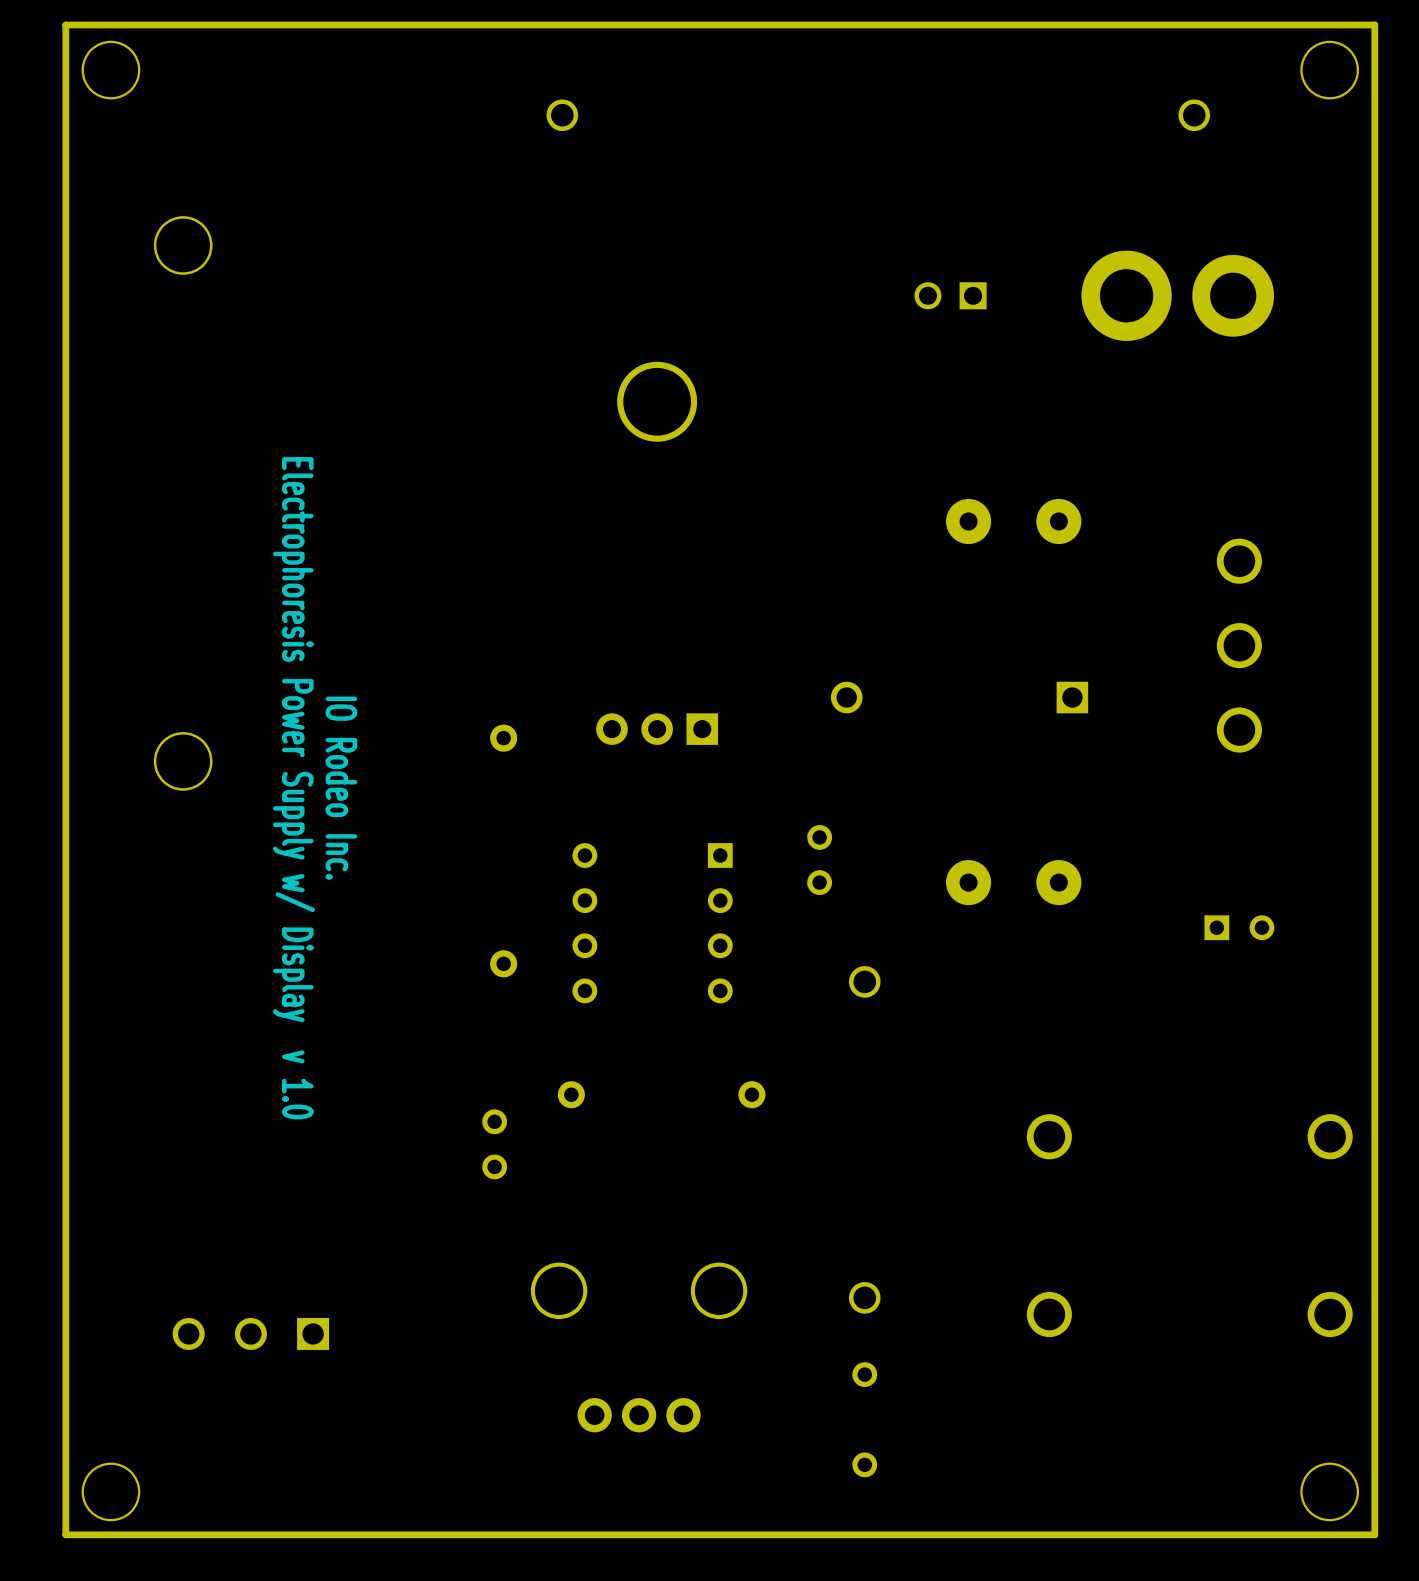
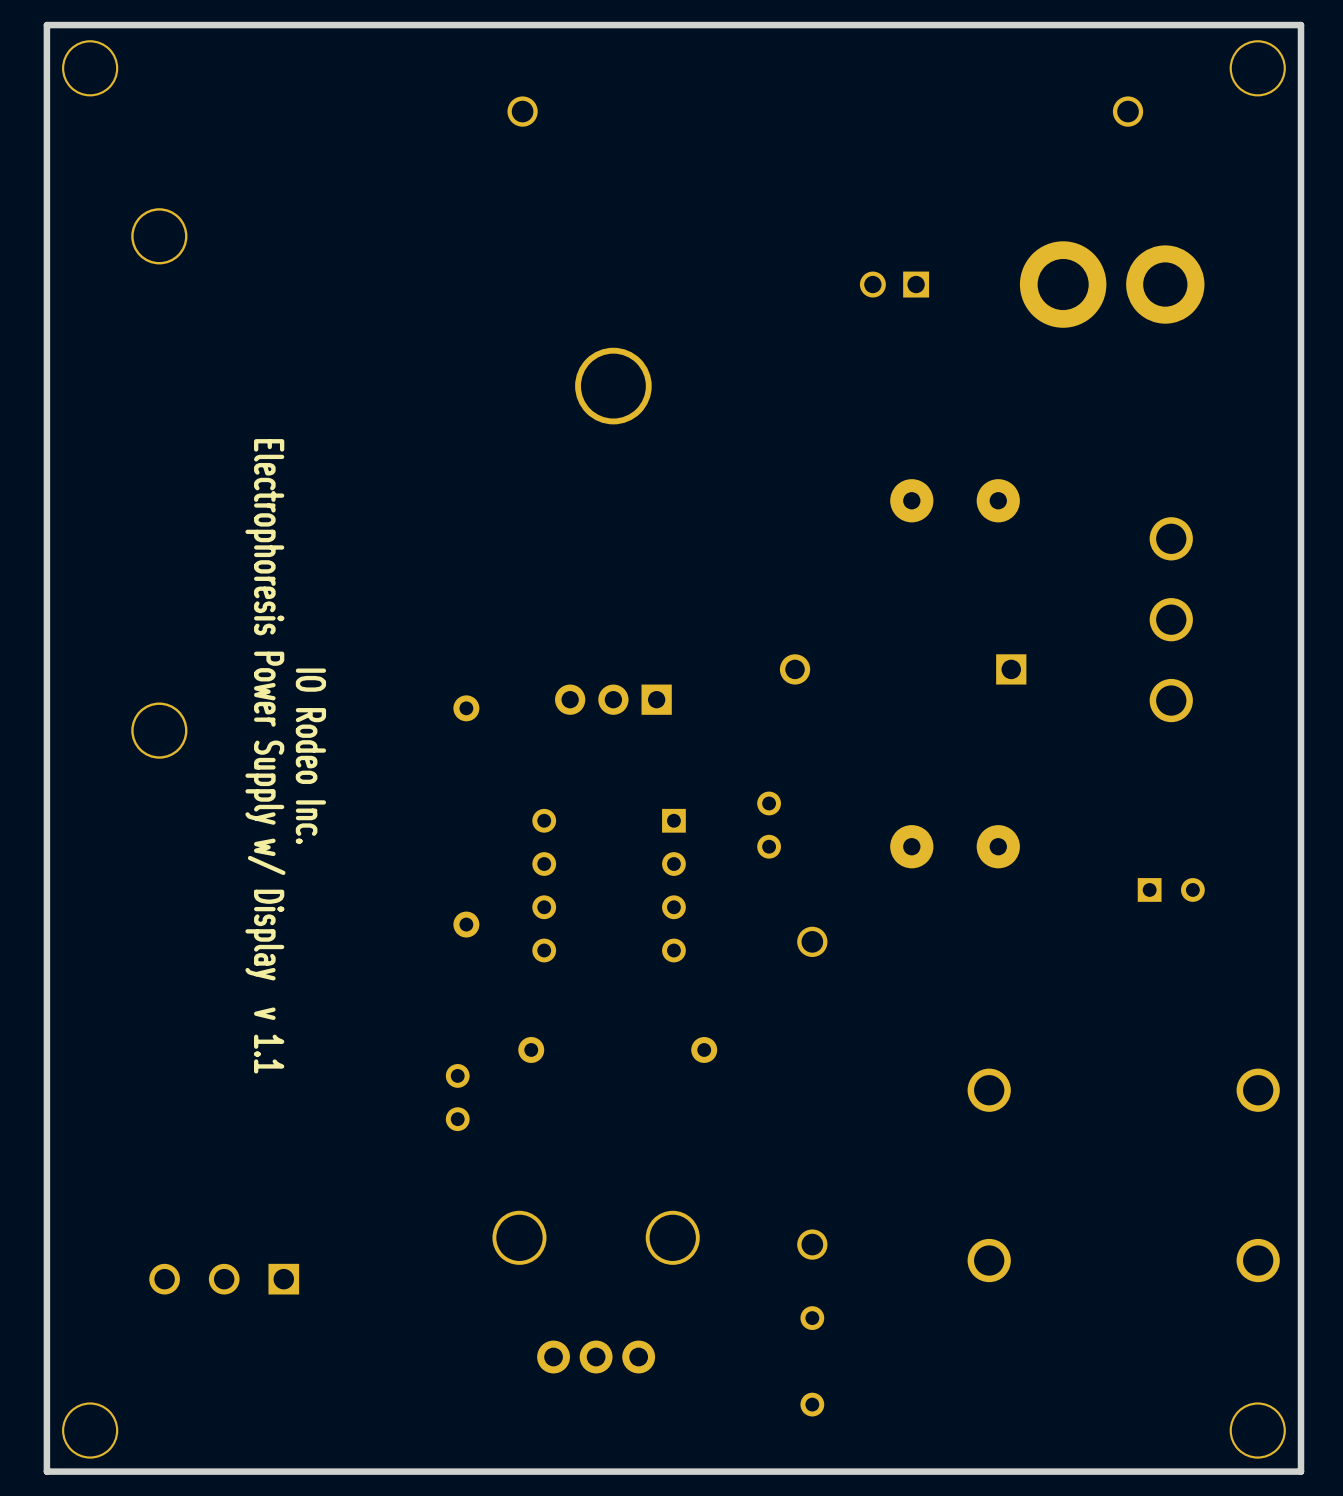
text: Electrophoresis Power Supply w/ Display v 1.0 (293, 788) -> Electrophoresis Power Supply w/ Display v 1.1 (265, 756)

